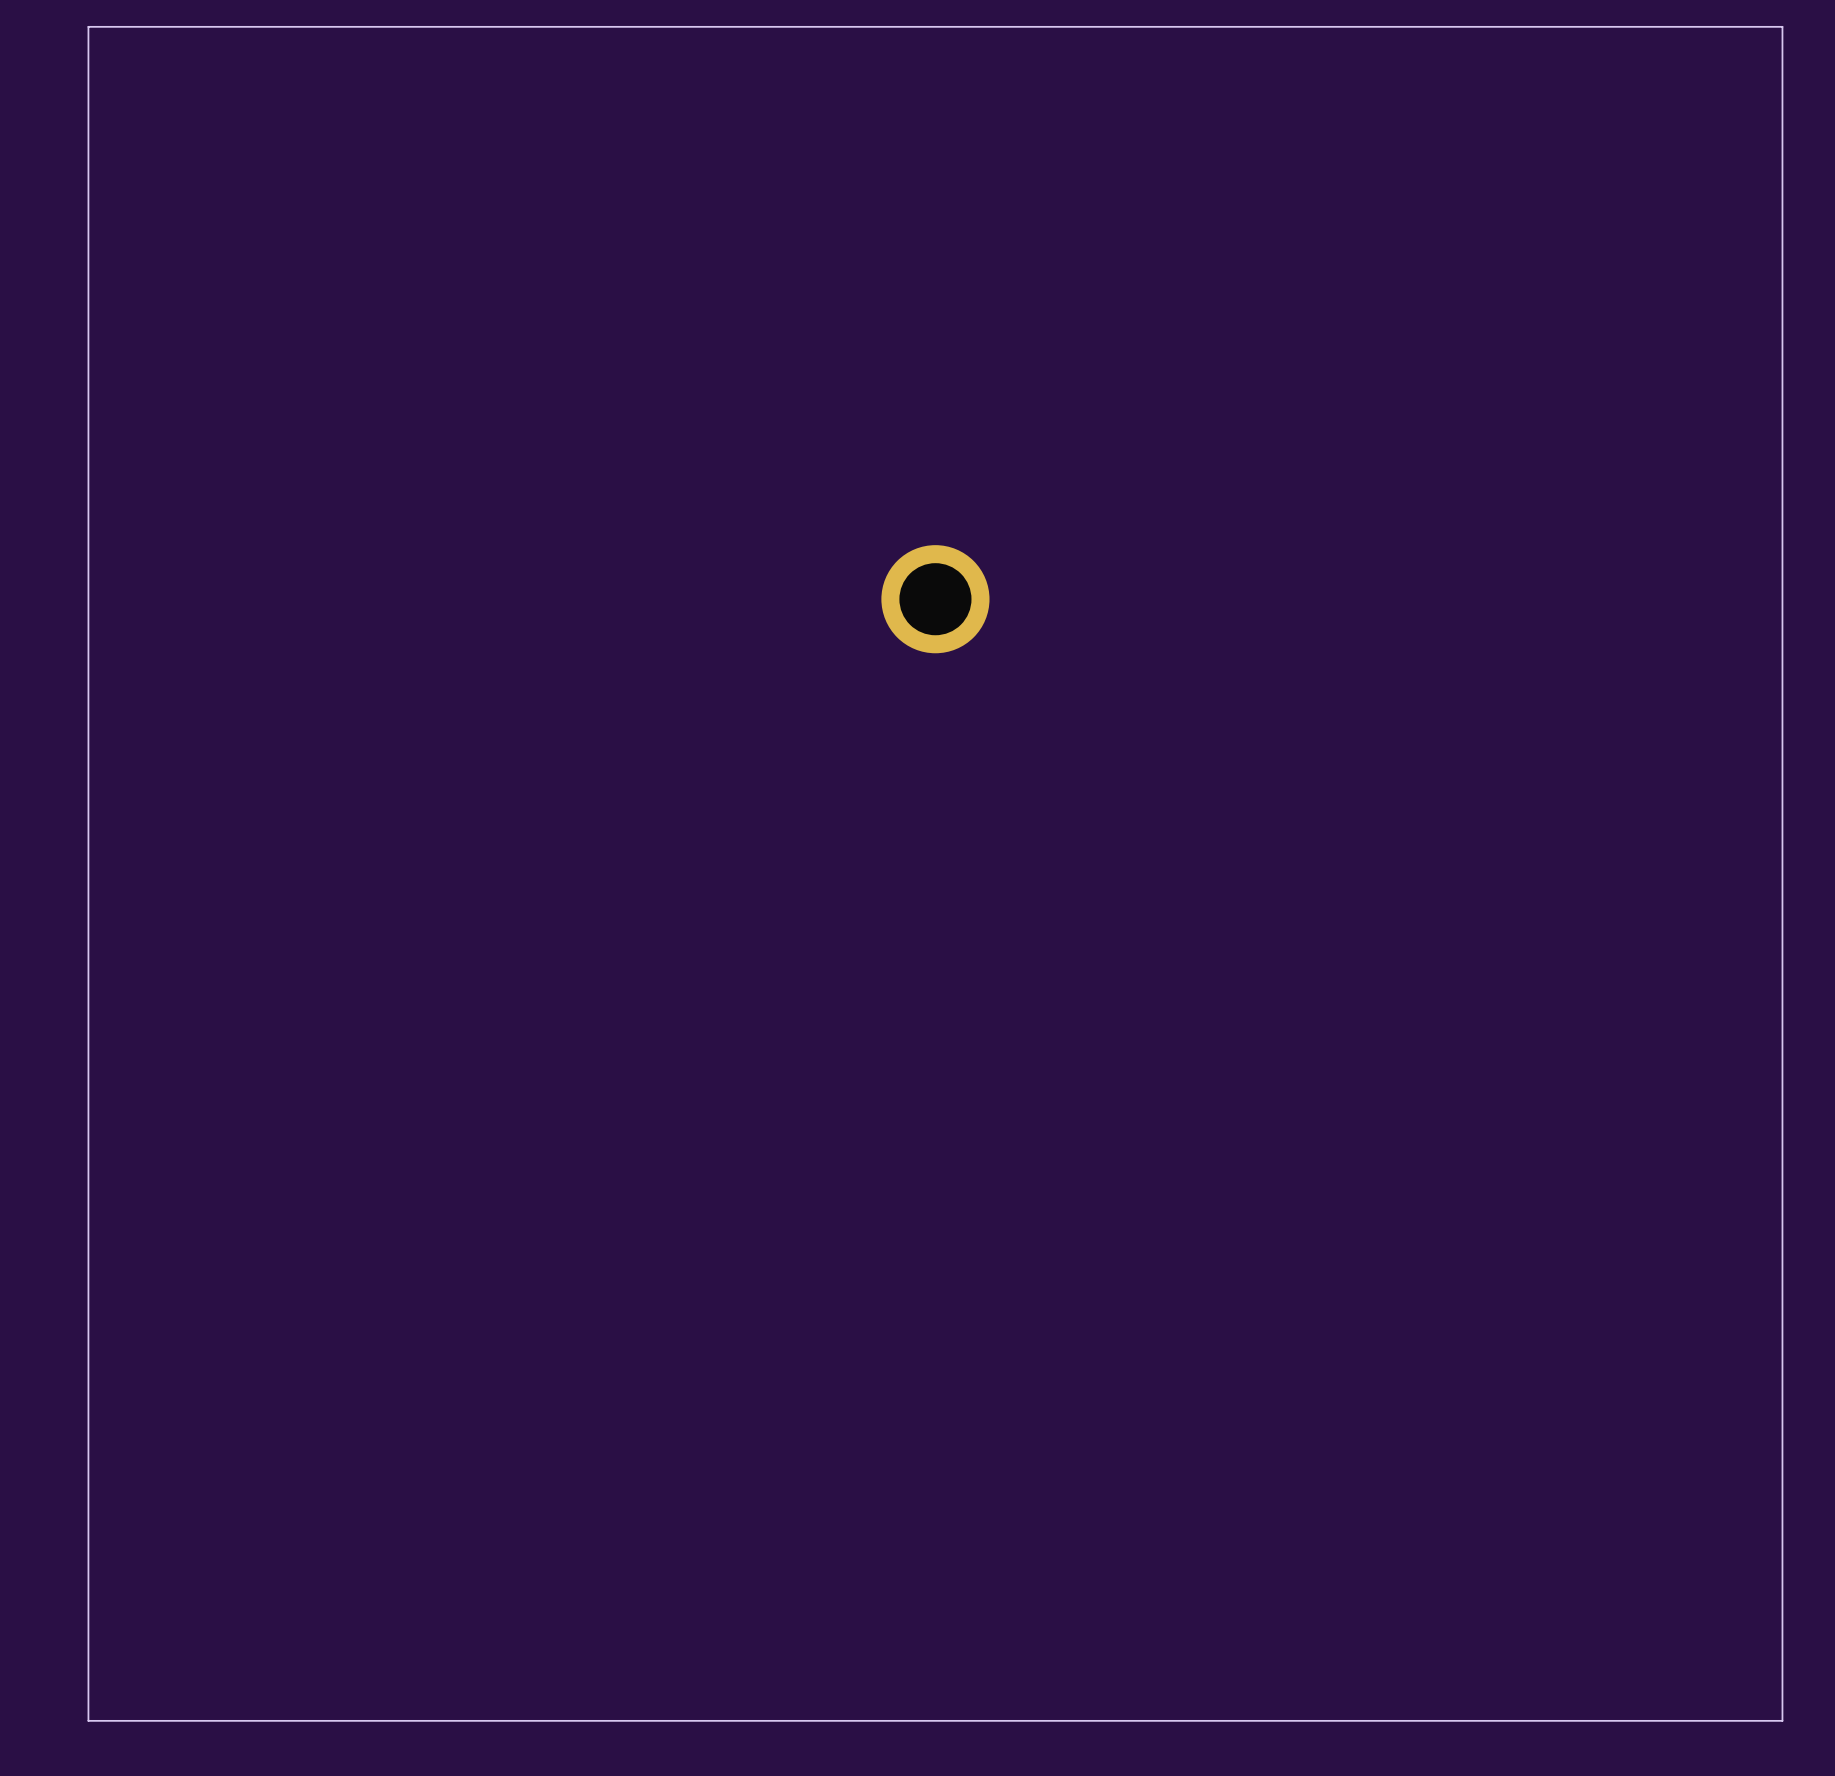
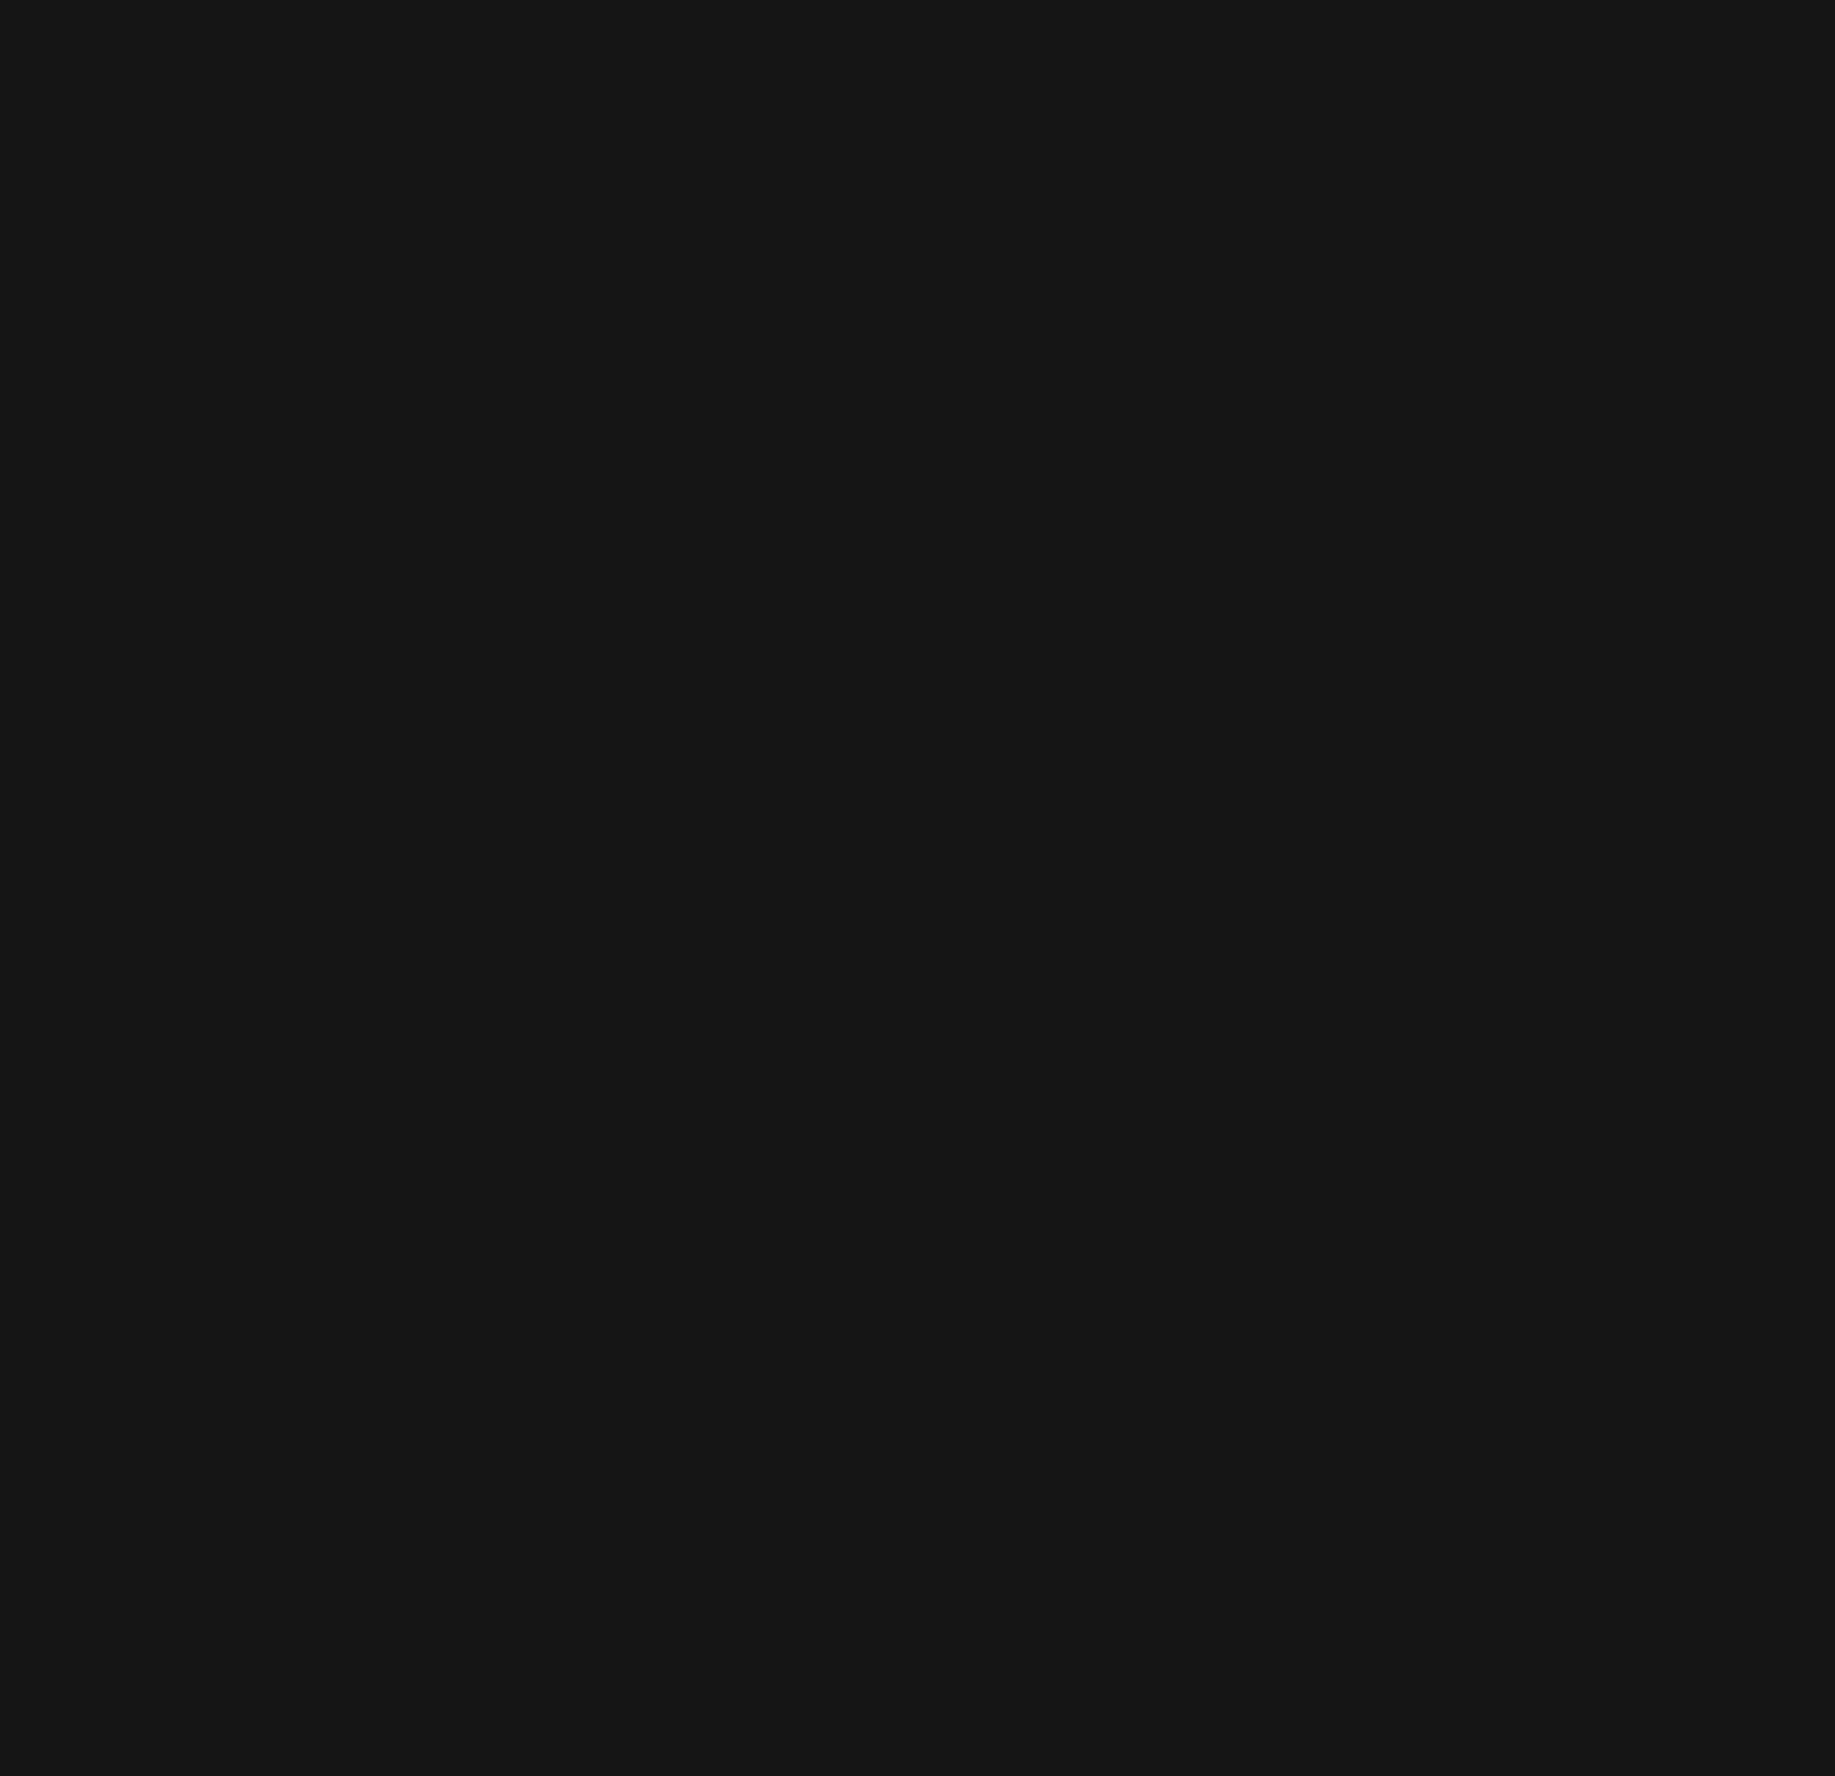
board edge: (1782, 26) (88, 26) (88, 1720) (1782, 1720) (1782, 26) -> none
part: (935, 599) -> none

